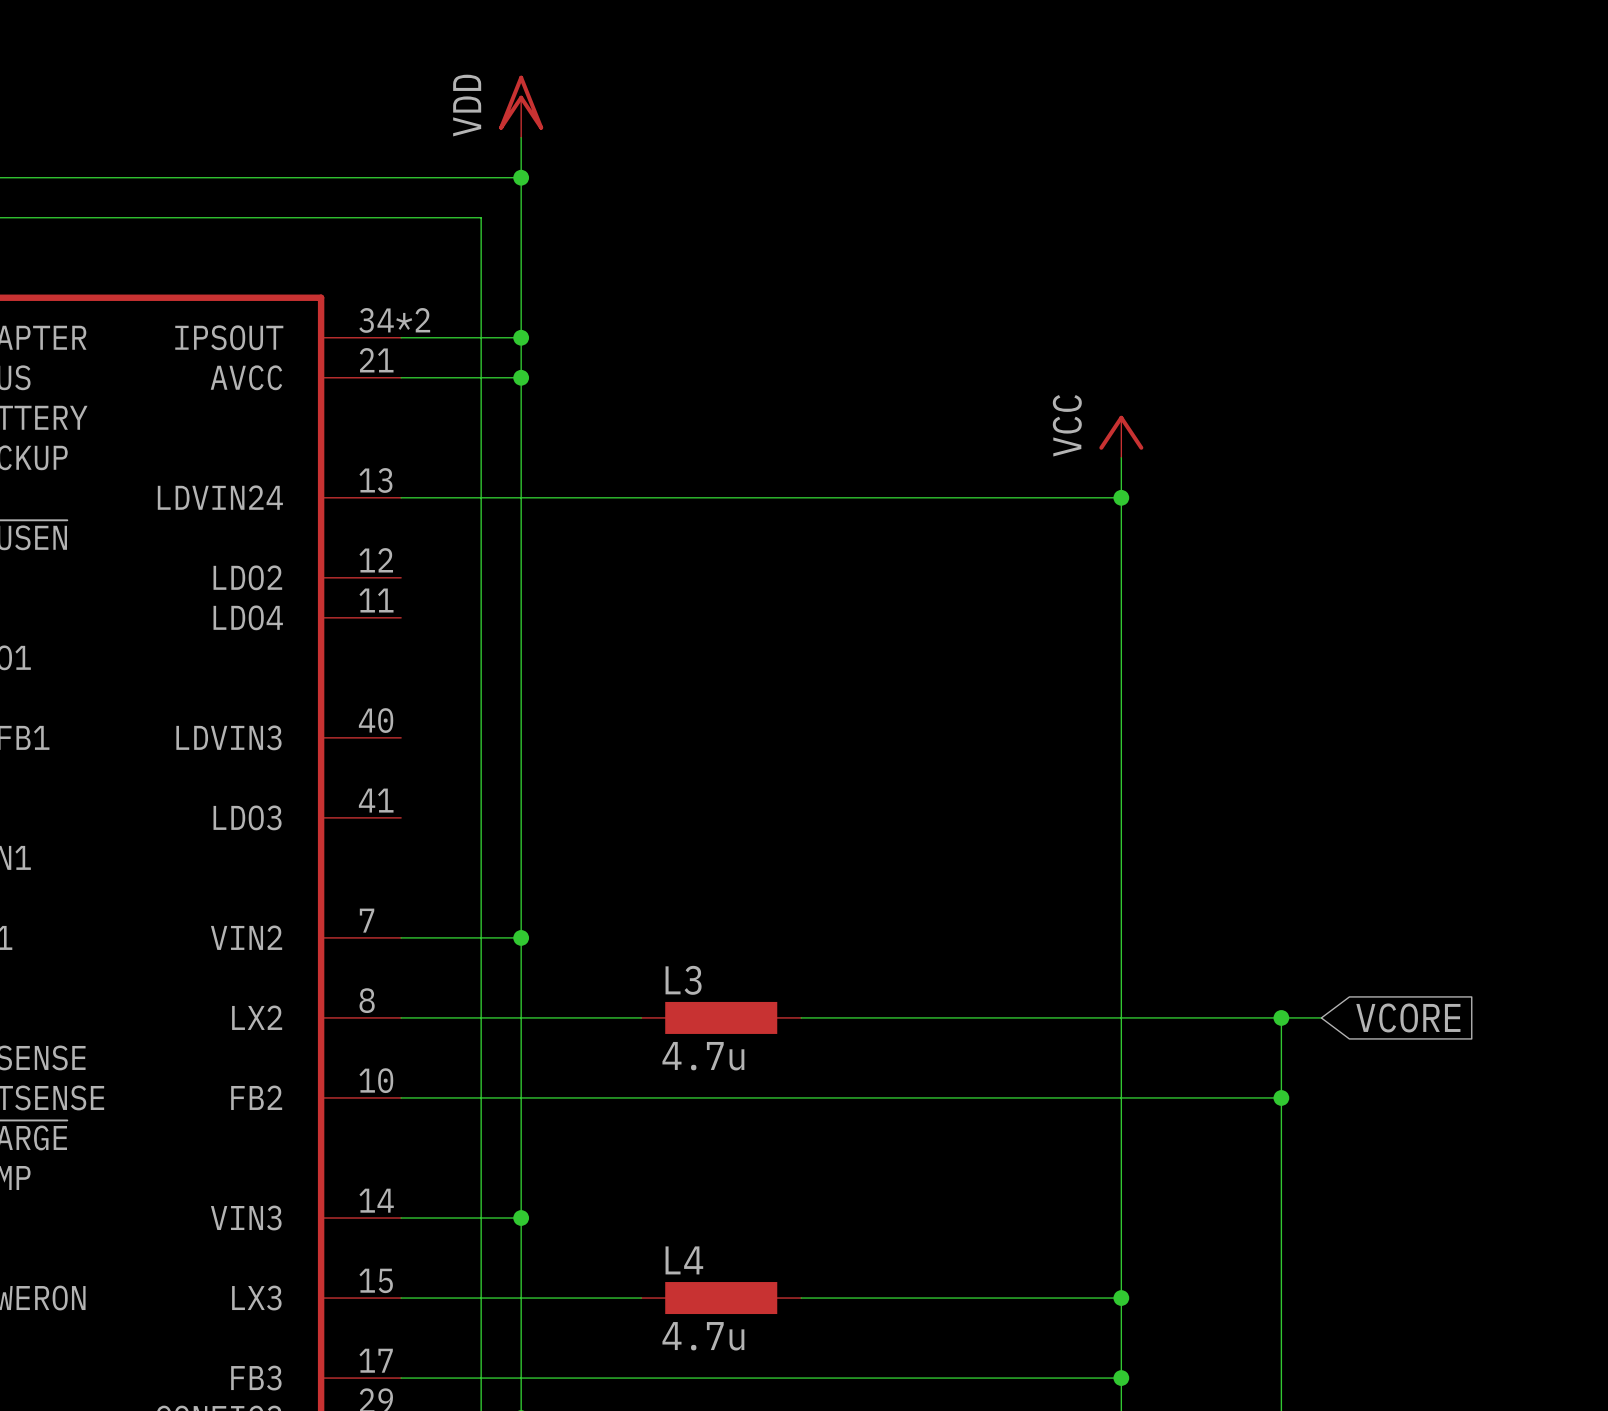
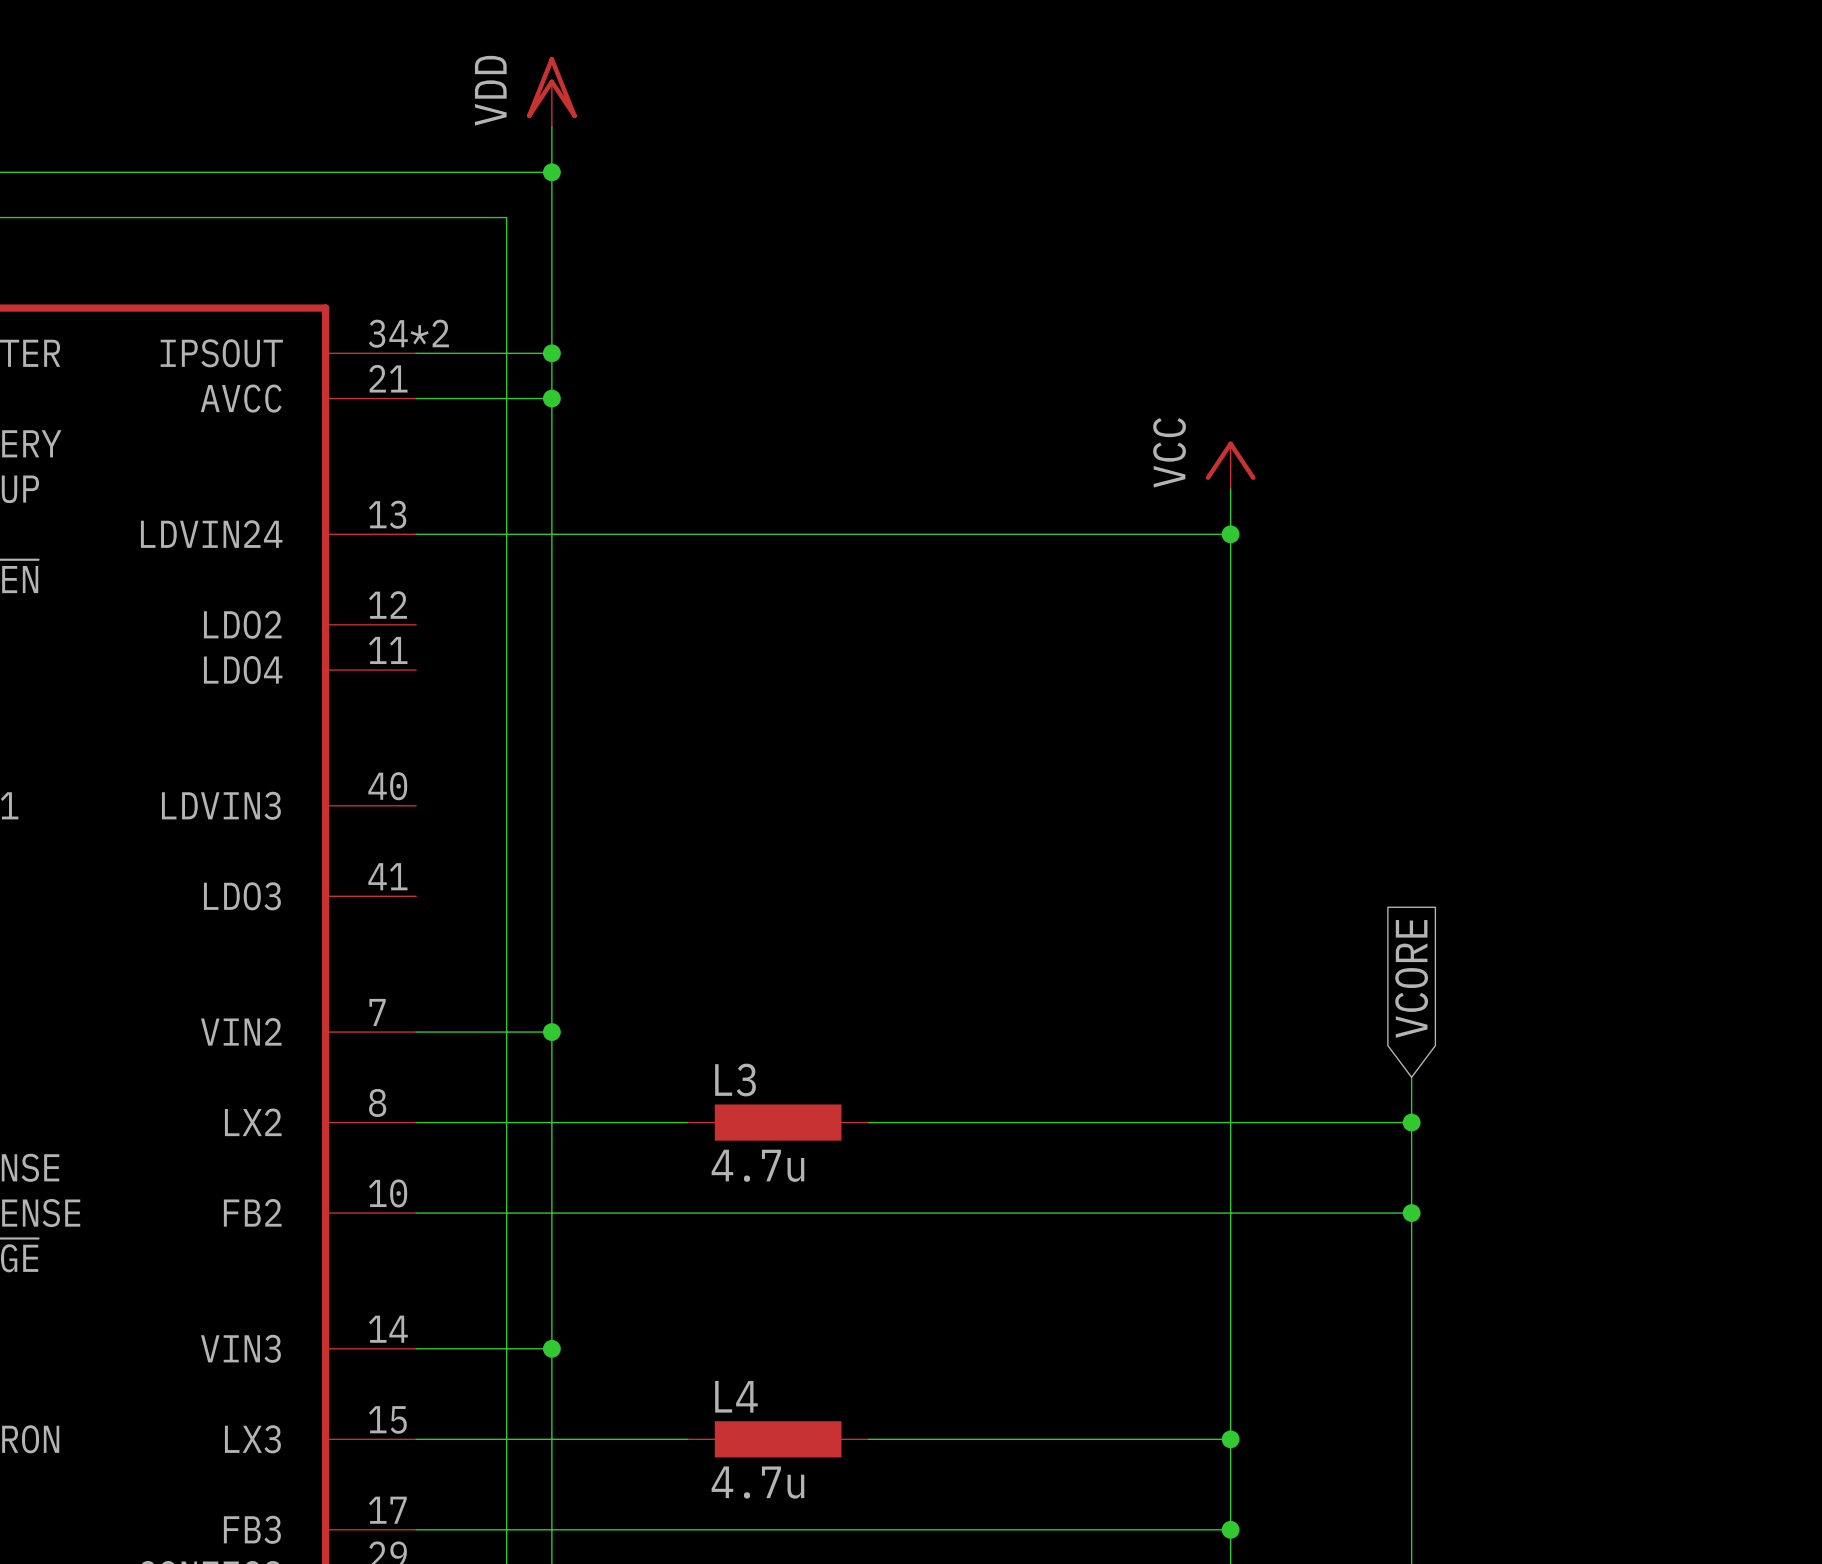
wire: (1281, 1017) (1321, 1017) -> (1411, 1122) (1411, 1077)
global label rotation: 0° (1408, 1017) -> 90° counterclockwise (1411, 978)

